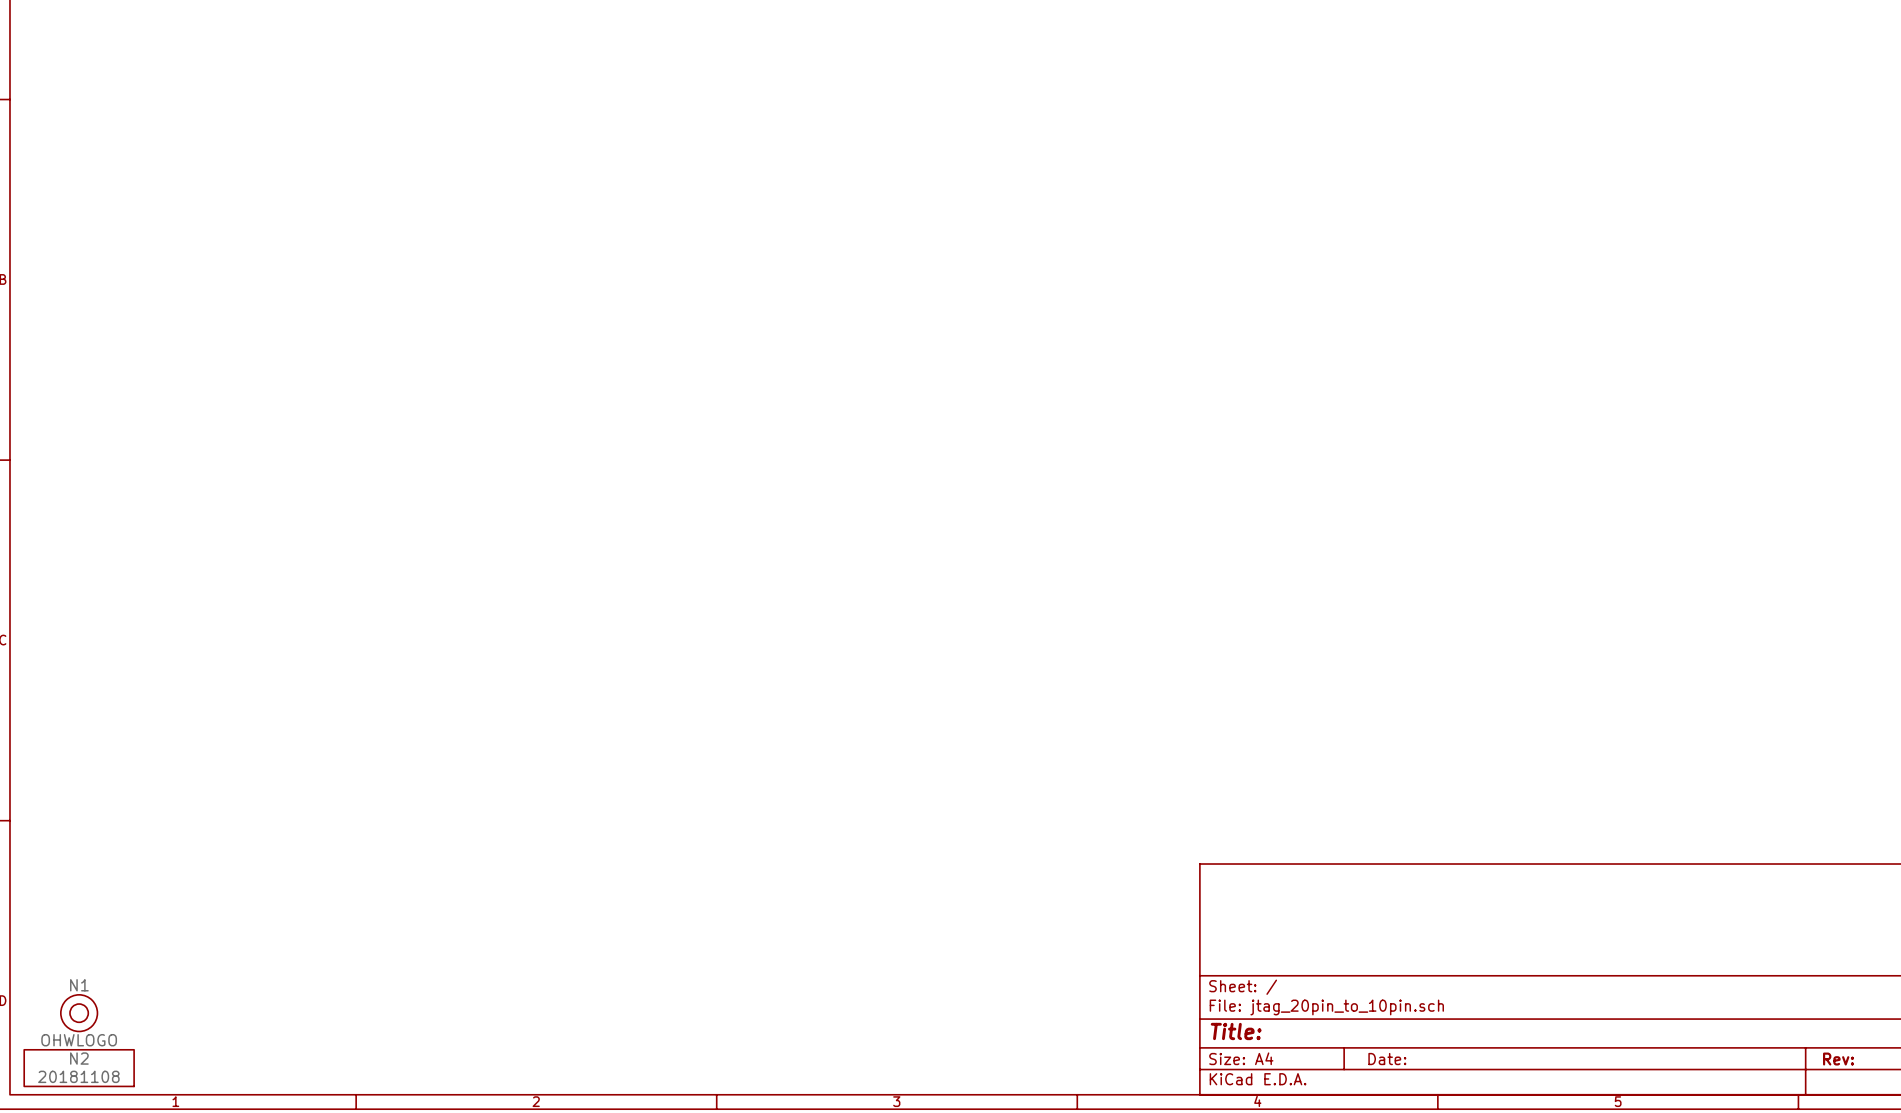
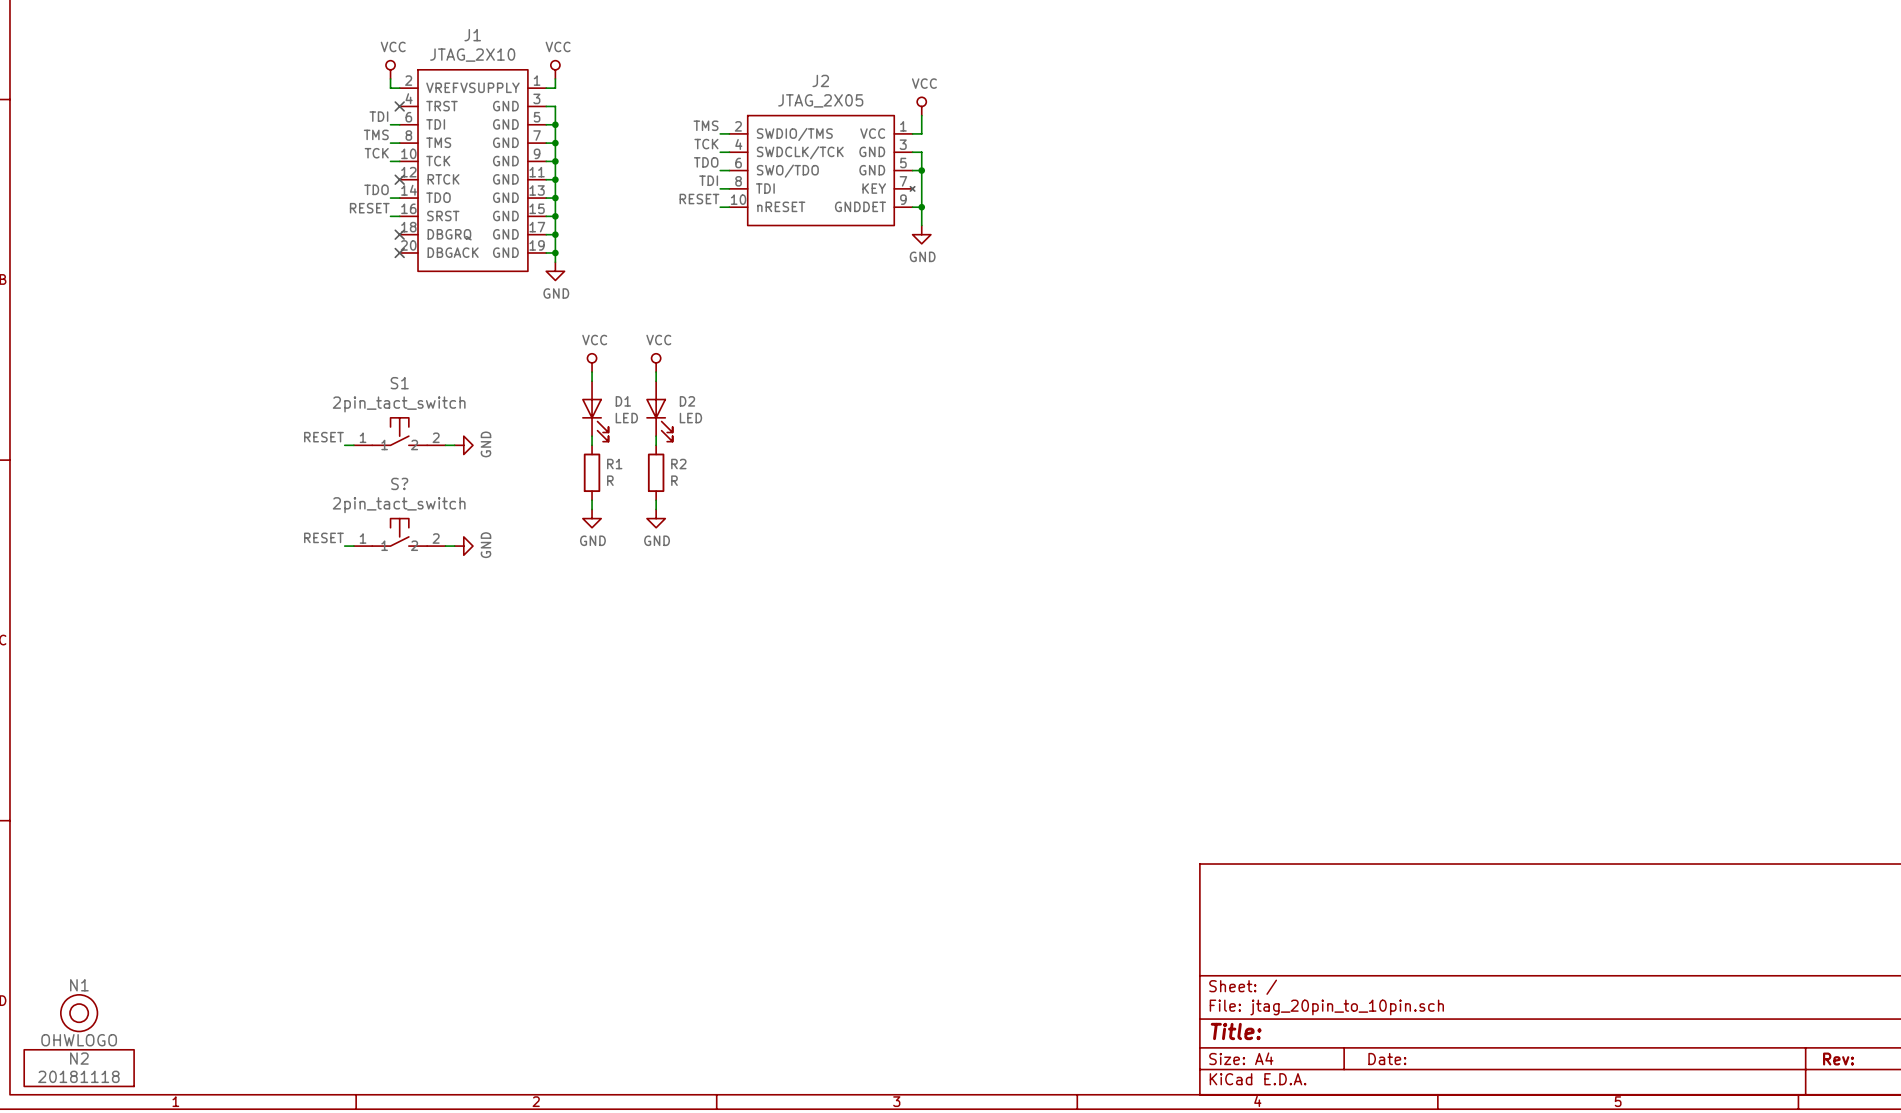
power symbol: none -> VCC (390, 69)
power symbol: none -> VCC (555, 69)
wire: none -> (390, 78) (390, 88) (399, 88)
wire: none -> (555, 78) (555, 88) (546, 88)
no-connect mark: none -> (399, 106)
wire: none -> (546, 106) (555, 106) (555, 262)
power symbol: none -> VCC (921, 106)
wire: none -> (921, 115) (921, 133) (912, 133)
label: none -> TDI (378, 116)
wire: none -> (390, 124) (399, 124)
wire: none -> (546, 124) (555, 124)
junction: none -> (555, 124)
label: none -> TMS (706, 125)
wire: none -> (720, 133) (729, 133)
label: none -> TMS (376, 134)
wire: none -> (390, 143) (399, 143)
wire: none -> (546, 143) (555, 143)
junction: none -> (555, 143)
label: none -> TCK (706, 144)
wire: none -> (720, 152) (729, 152)
wire: none -> (912, 152) (921, 152) (921, 225)
label: none -> TCK (376, 153)
wire: none -> (390, 161) (399, 161)
wire: none -> (546, 161) (555, 161)
junction: none -> (555, 161)
label: none -> TDO (706, 162)
J1: none -> JTAG_2X10 (472, 170)
wire: none -> (720, 170) (729, 170)
J2: none -> JTAG_2X05 (822, 170)
wire: none -> (912, 170) (921, 170)
junction: none -> (921, 170)
no-connect mark: none -> (399, 179)
wire: none -> (546, 179) (555, 179)
junction: none -> (555, 179)
label: none -> TDI (708, 180)
wire: none -> (720, 188) (729, 188)
label: none -> TDO (376, 189)
wire: none -> (390, 198) (399, 198)
wire: none -> (546, 198) (555, 198)
junction: none -> (555, 198)
label: none -> RESET (699, 199)
wire: none -> (720, 207) (729, 207)
wire: none -> (912, 207) (921, 207)
junction: none -> (921, 207)
label: none -> RESET (369, 208)
wire: none -> (390, 216) (399, 216)
wire: none -> (546, 216) (555, 216)
junction: none -> (555, 216)
no-connect mark: none -> (399, 234)
wire: none -> (546, 234) (555, 234)
junction: none -> (555, 234)
power symbol: none -> GND (921, 234)
no-connect mark: none -> (399, 252)
wire: none -> (546, 252) (555, 252)
junction: none -> (555, 252)
power symbol: none -> GND (555, 271)
power symbol: none -> VCC (592, 362)
power symbol: none -> VCC (656, 362)
wire: none -> (592, 372) (592, 381)
wire: none -> (656, 372) (656, 381)
D1: none -> LED (595, 411)
D2: none -> LED (659, 411)
S1: none -> 2pin_tact_switch (399, 431)
wire: none -> (592, 436) (592, 445)
wire: none -> (656, 436) (656, 445)
label: none -> RESET (323, 437)
wire: none -> (344, 445) (353, 445)
wire: none -> (445, 445) (454, 445)
power symbol: none -> GND (463, 445)
R1: none -> R (592, 472)
R2: none -> R (656, 472)
wire: none -> (592, 500) (592, 509)
wire: none -> (656, 500) (656, 509)
power symbol: none -> GND (592, 518)
power symbol: none -> GND (656, 518)
S?: none -> 2pin_tact_switch (399, 532)
label: none -> RESET (323, 537)
wire: none -> (344, 546) (353, 546)
wire: none -> (445, 546) (454, 546)
power symbol: none -> GND (463, 546)
N2 value: 20181108 (78, 1076) -> 20181118 (78, 1076)

